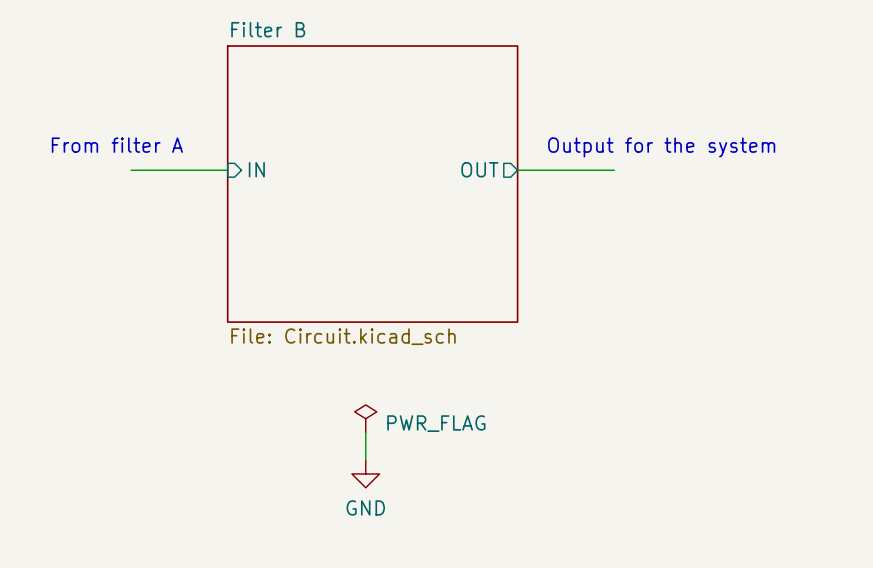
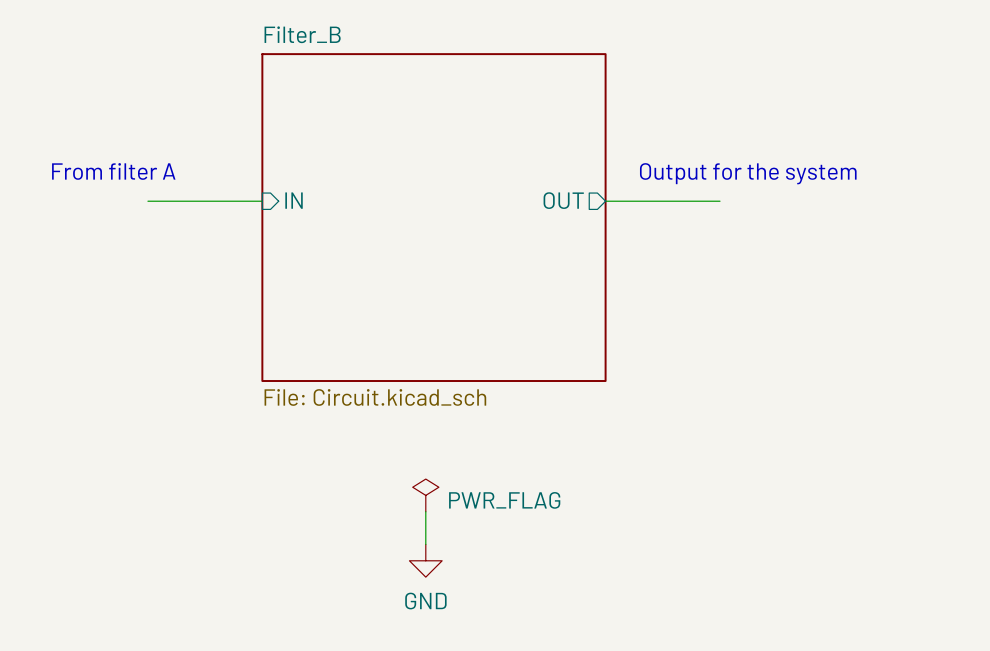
sheet Filter B name: Filter B (268, 29) -> Filter_B (302, 34)

